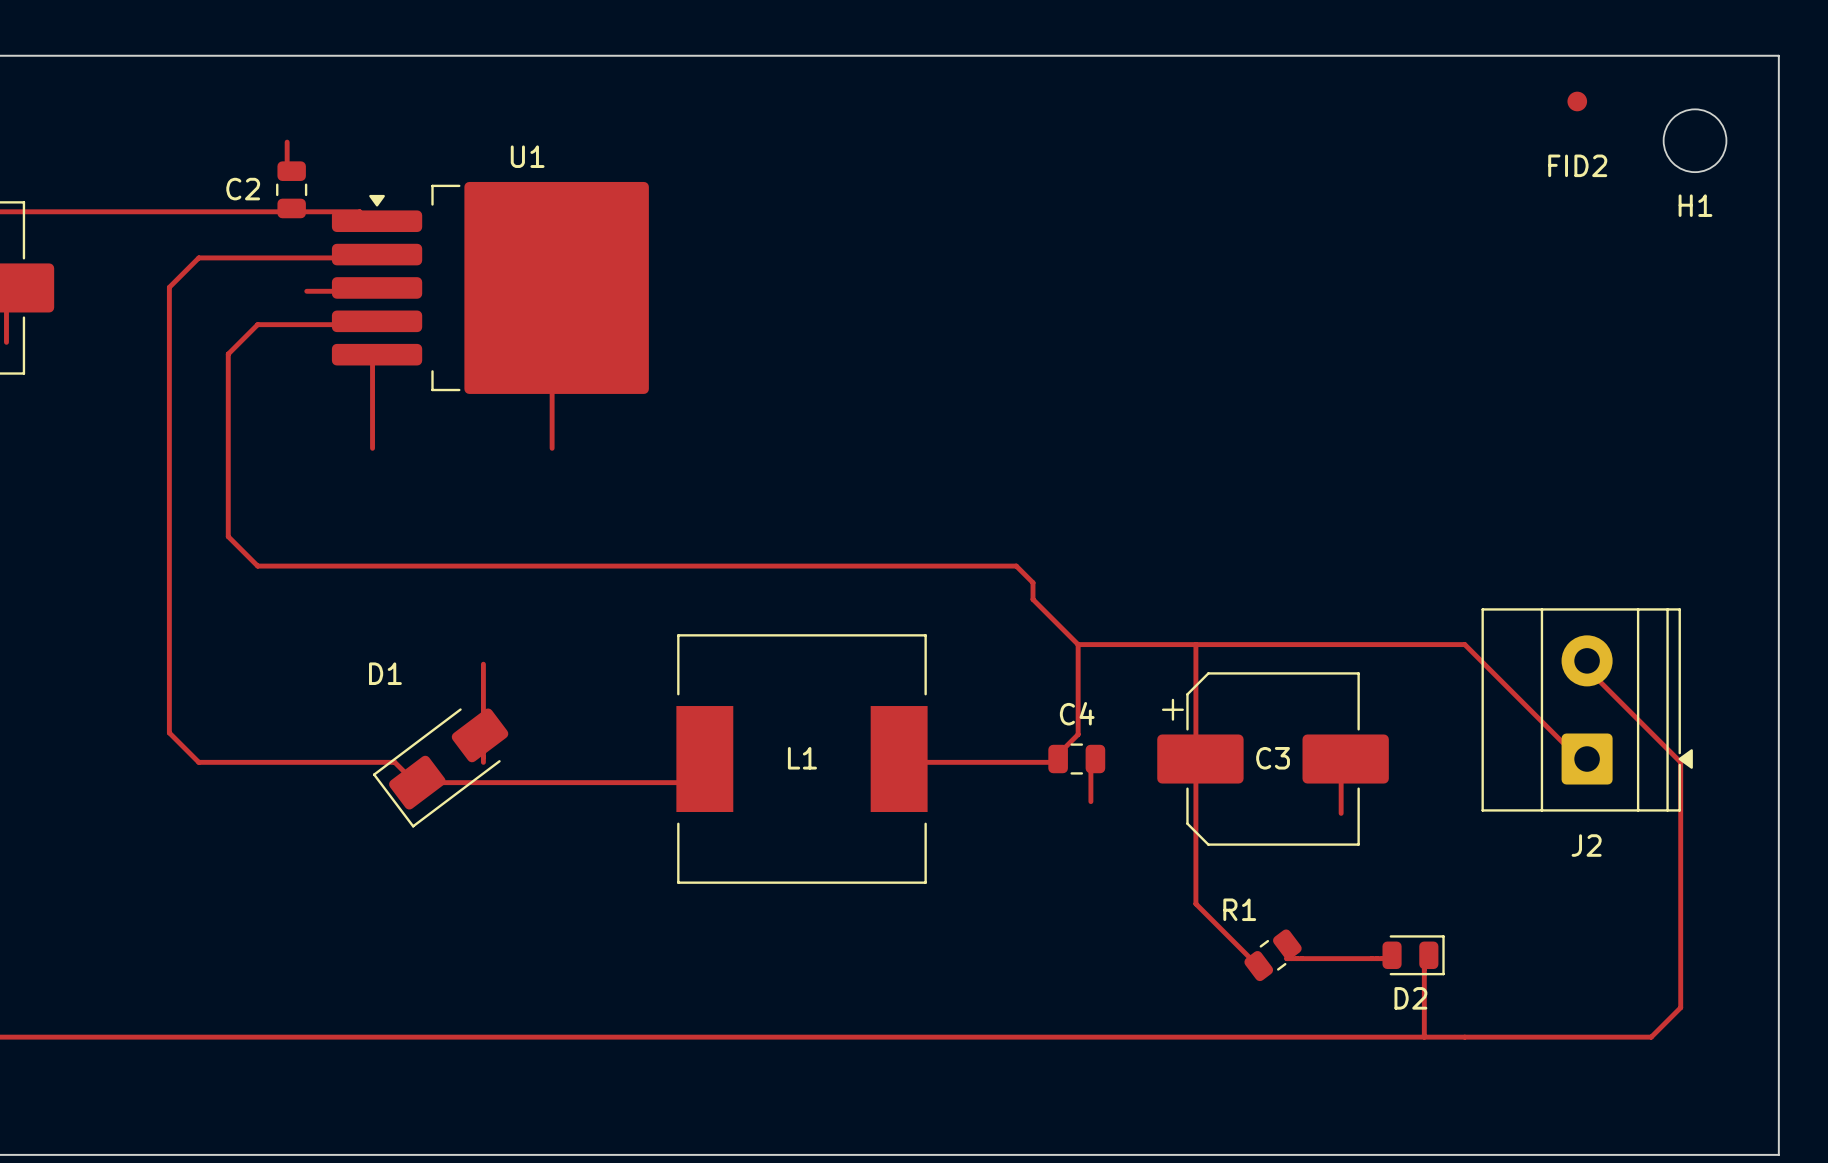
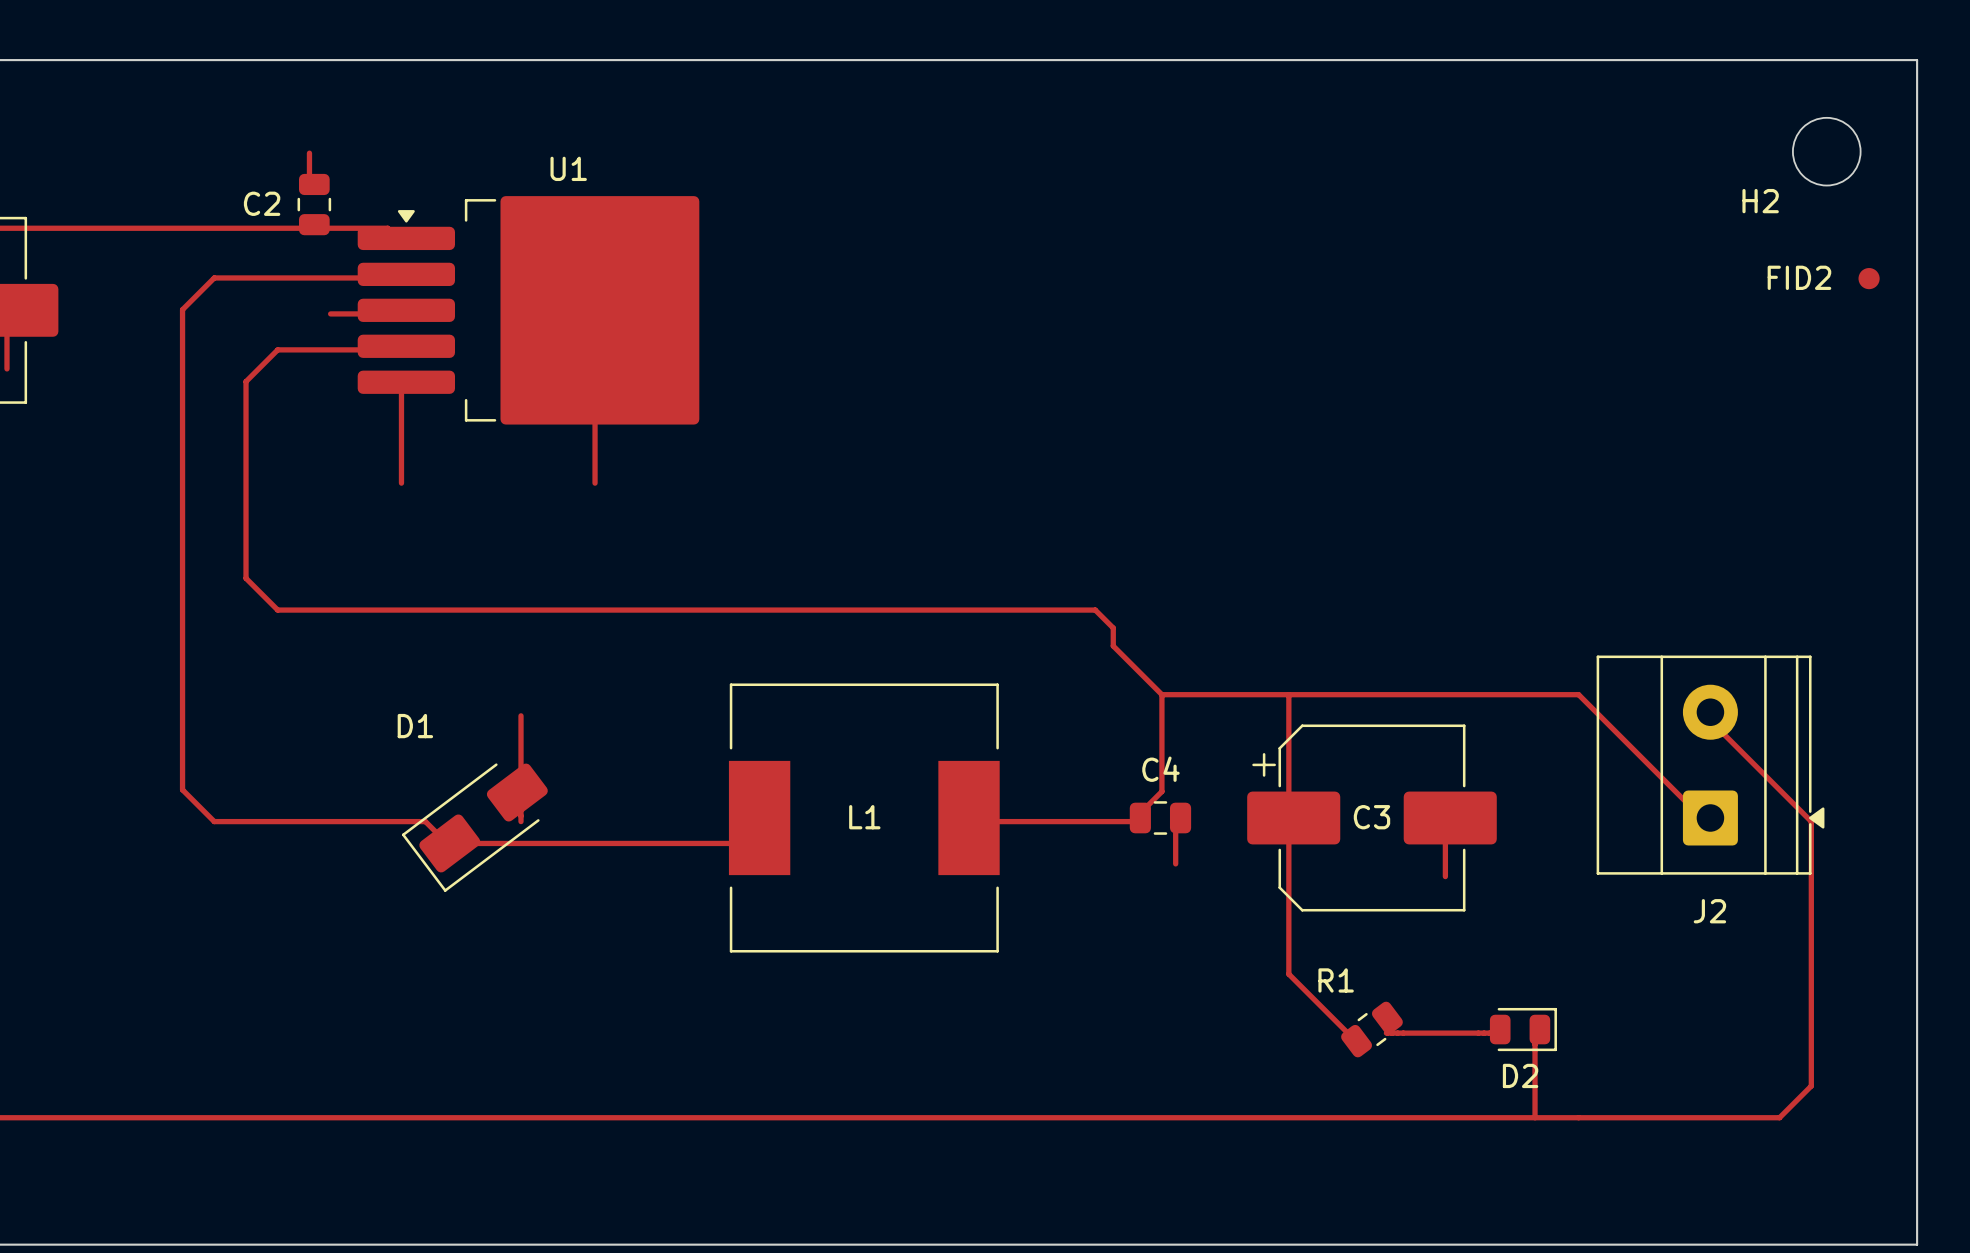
FID2 position: (1577, 101) -> (1869, 278)
FID2 name position: FID2 (1577, 165) -> FID2 (1799, 277)
H1 name: H1 (1695, 205) -> H2 (1760, 201)

